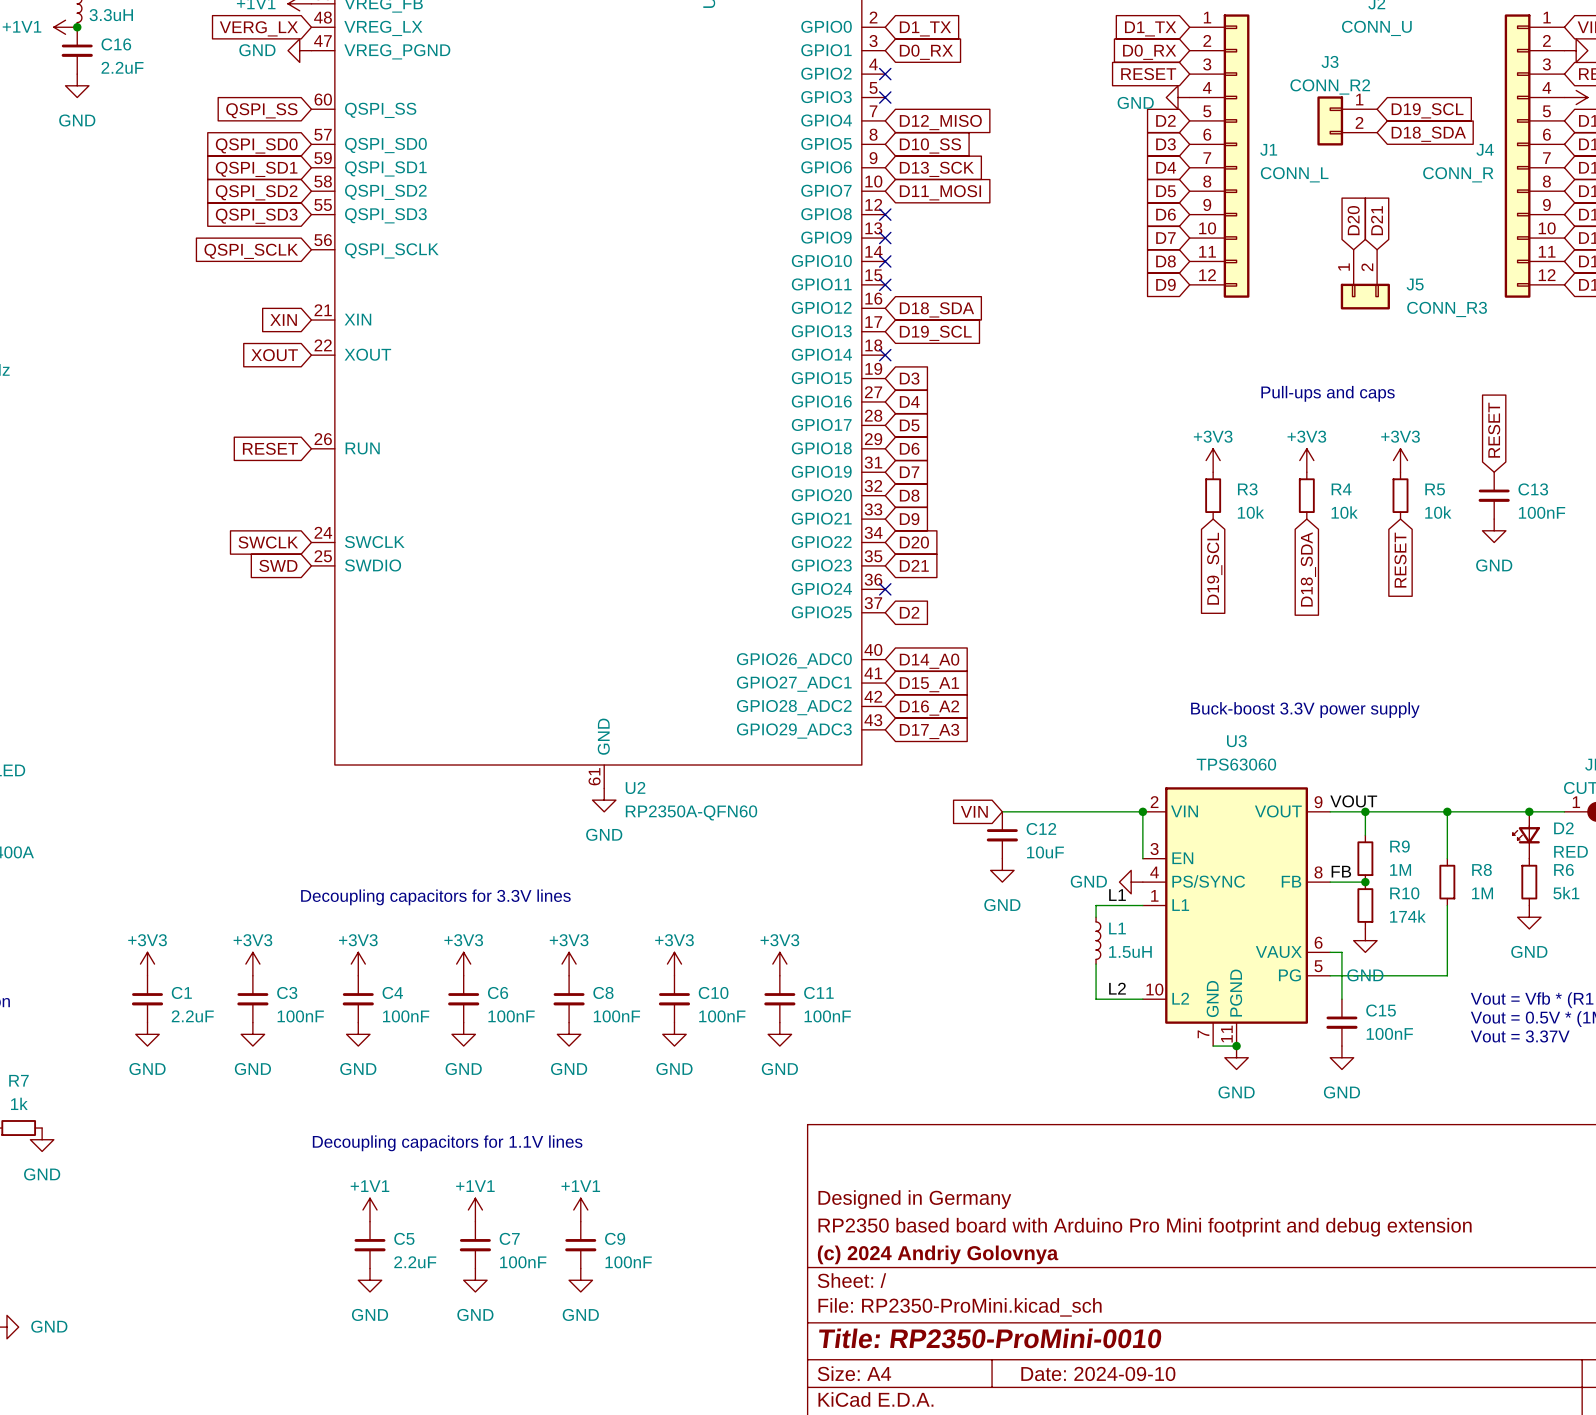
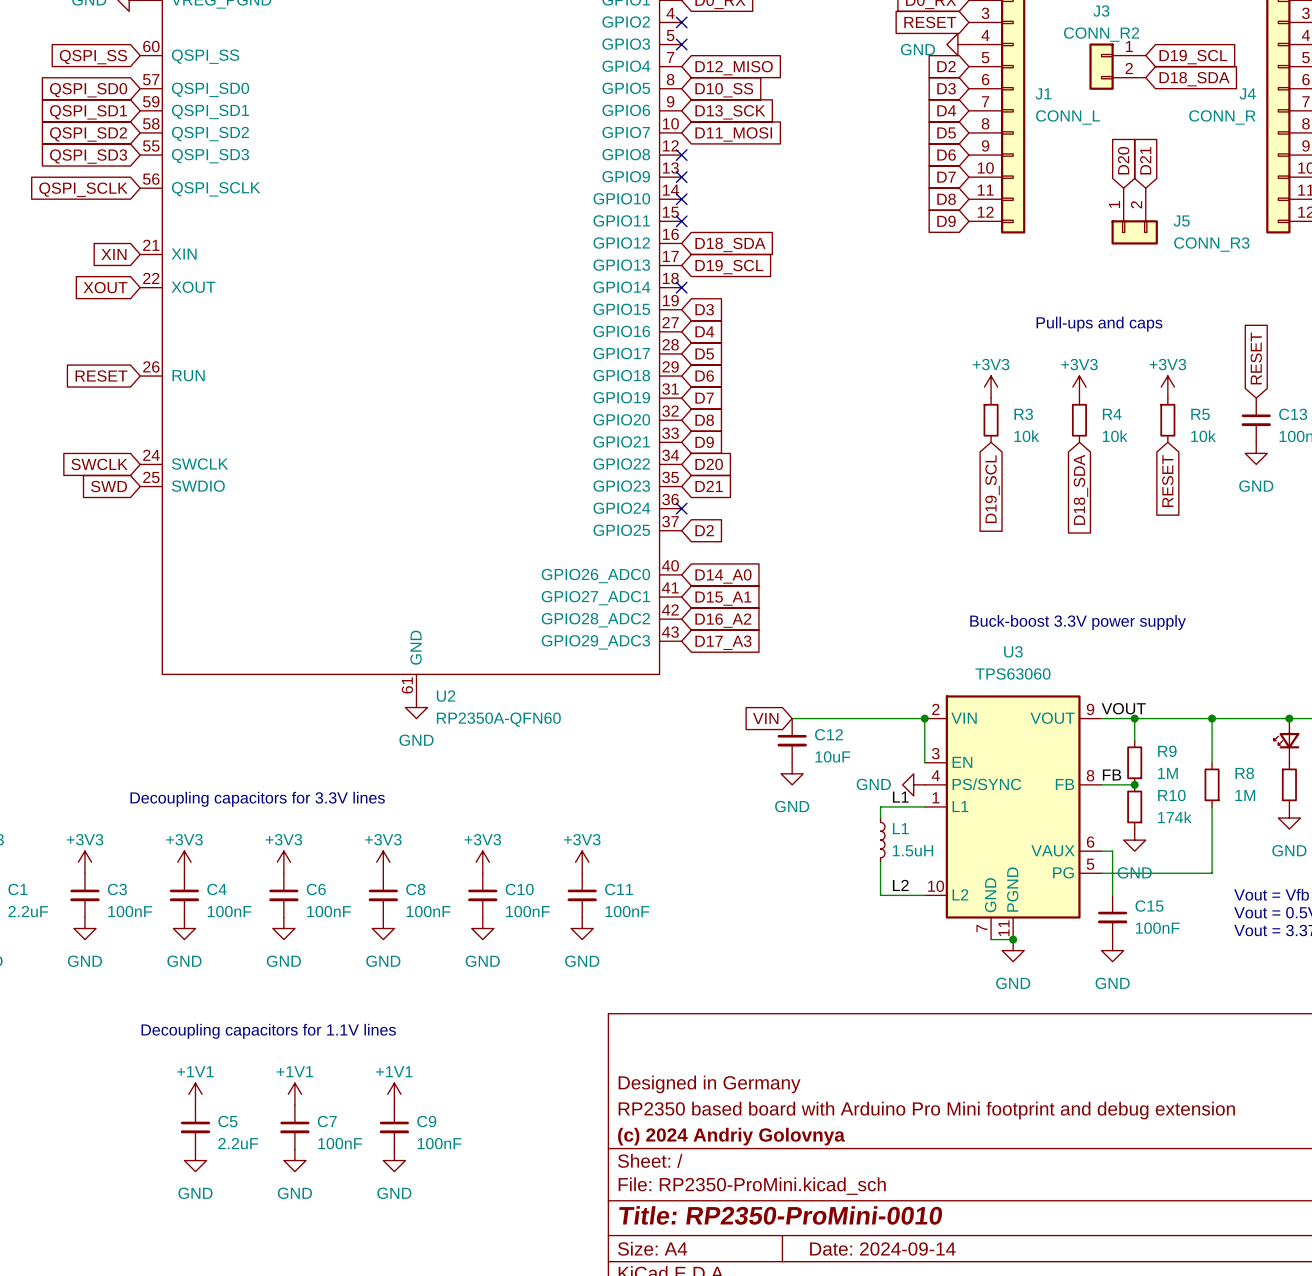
title block: Date: 2024-09-10 (1098, 1373) -> Date: 2024-09-14 (882, 1248)

